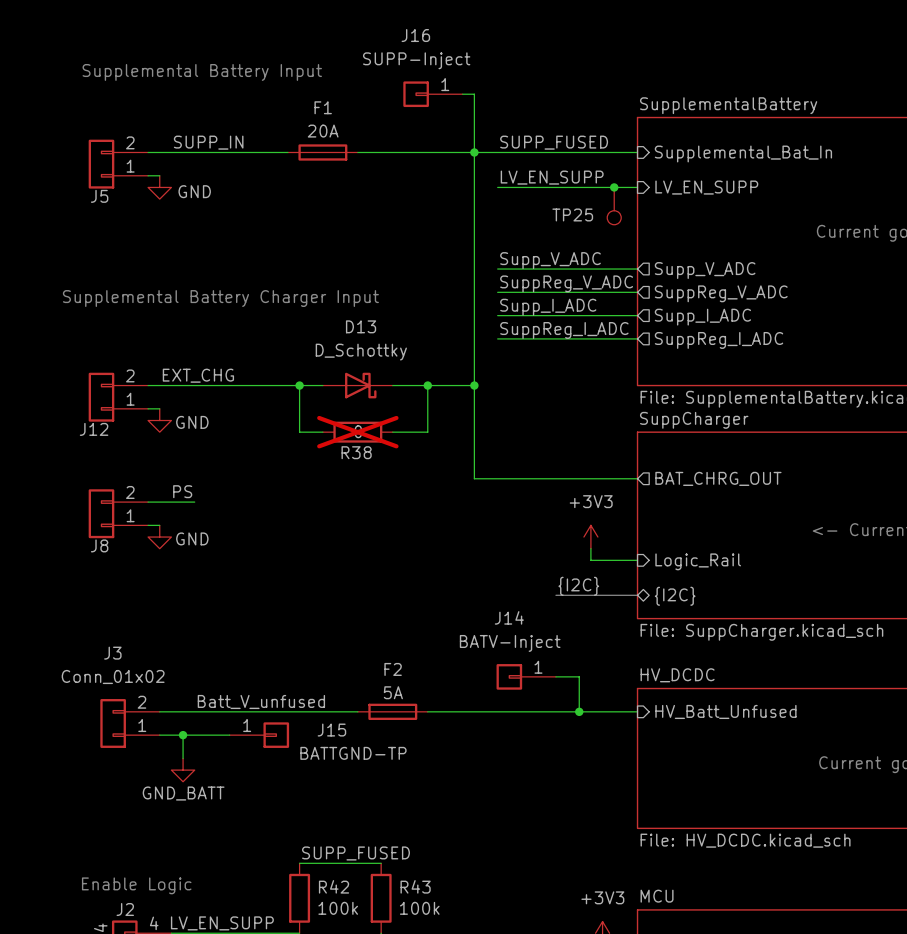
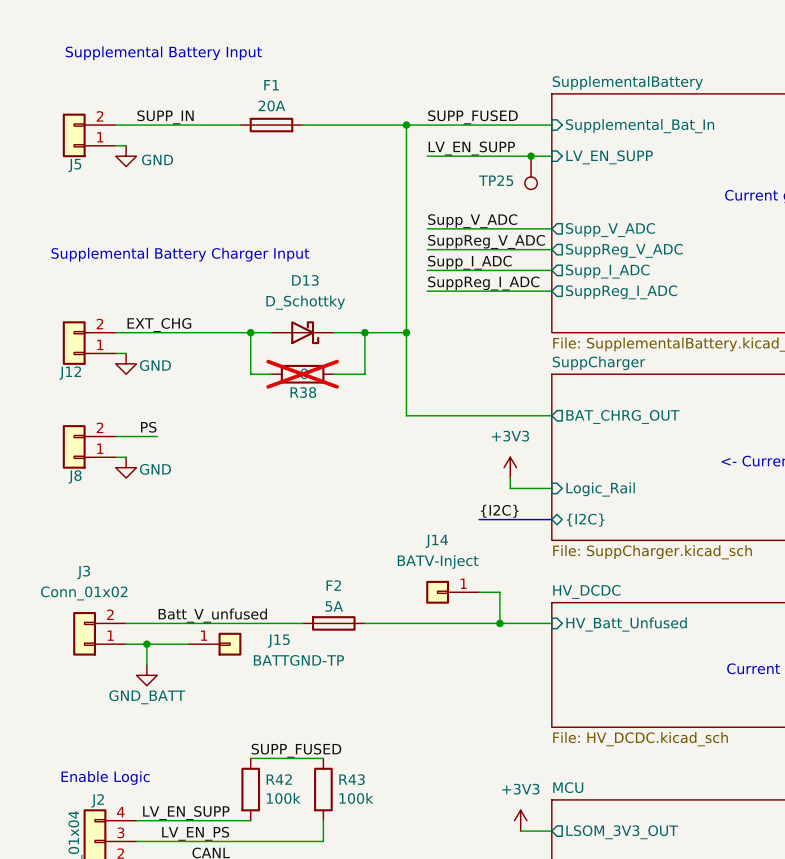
J16: SUPP-Inject (433, 94) -> none
wire: (462, 94) (474, 94) (474, 152) -> none

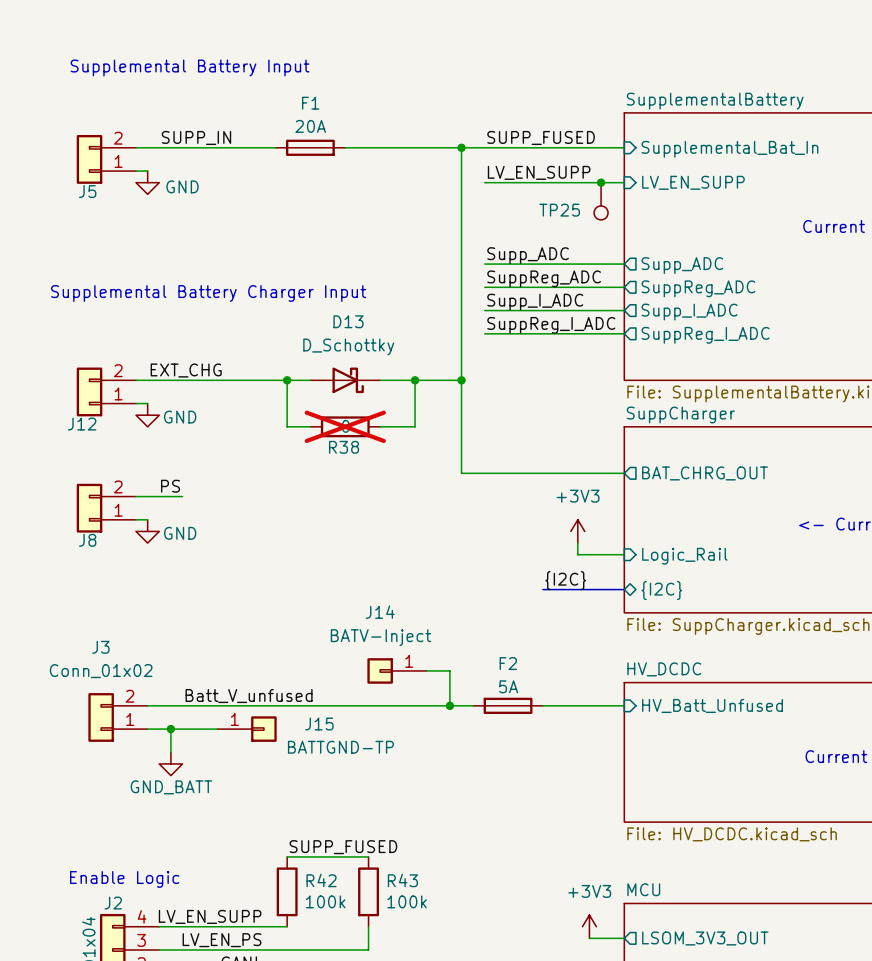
label: Supp_V_ADC (472, 221) -> Supp_ADC (528, 255)
sheet pin: Supp_V_ADC (610, 230) -> Supp_ADC (682, 265)
label: SuppReg_V_ADC (486, 241) -> SuppReg_ADC (544, 278)
sheet pin: SuppReg_V_ADC (624, 250) -> SuppReg_ADC (698, 288)
J14 position: (452, 592) -> (397, 670)
wire: (479, 592) (499, 592) (499, 623) -> (426, 670) (449, 670) (449, 705)
F2 position: (333, 623) -> (508, 705)
junction: none -> (449, 705)
junction: (499, 623) -> none

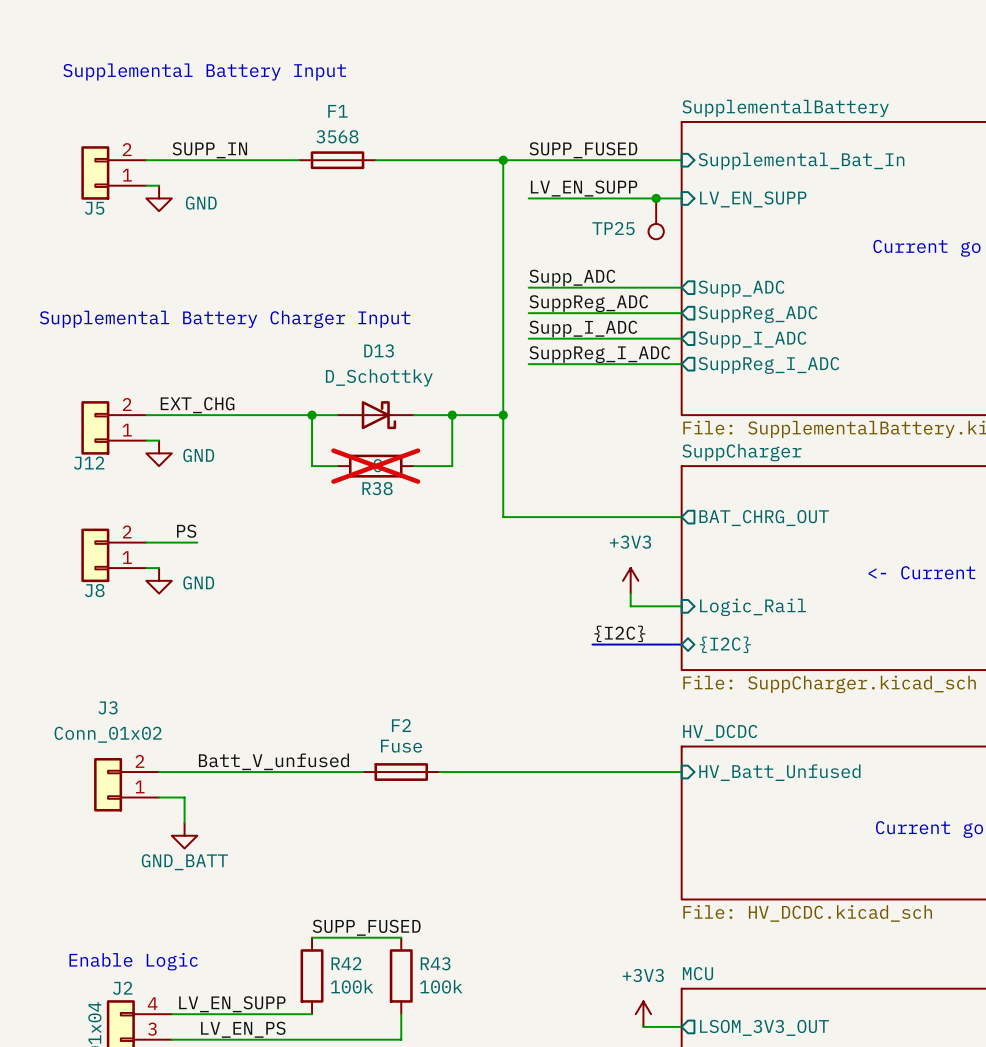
F1 value: 20A (310, 126) -> 3568 (337, 136)
J14: BATV-Inject (397, 670) -> none
wire: (426, 670) (449, 670) (449, 705) -> none
F2 value: 5A (508, 686) -> Fuse (401, 746)
junction: (449, 705) -> none
F2 position: (508, 705) -> (401, 772)
wire: (170, 729) (217, 729) -> none
junction: (170, 729) -> none
J15: BATTGND-TP (247, 729) -> none

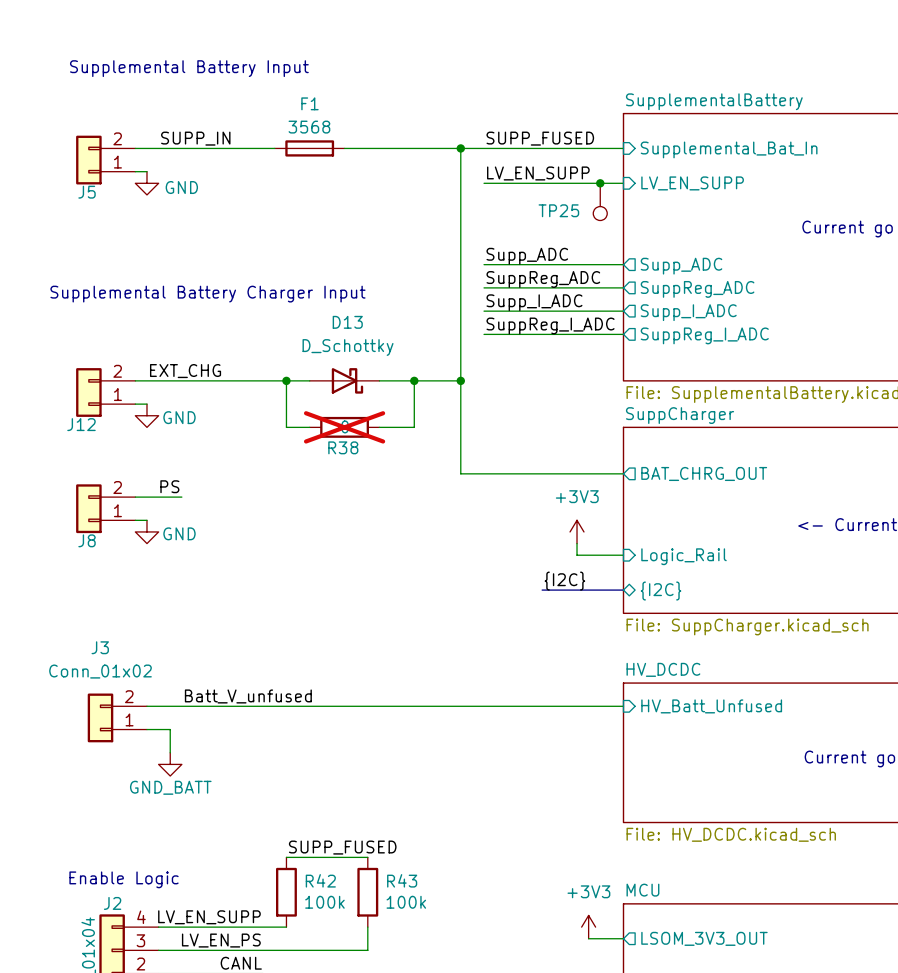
F2: Fuse (401, 772) -> none

